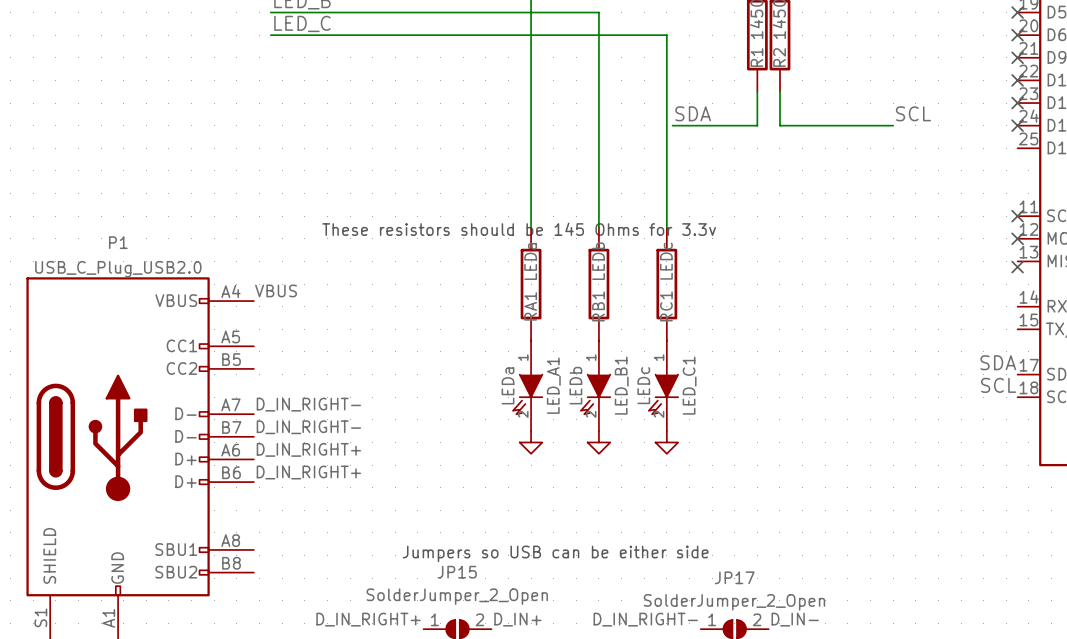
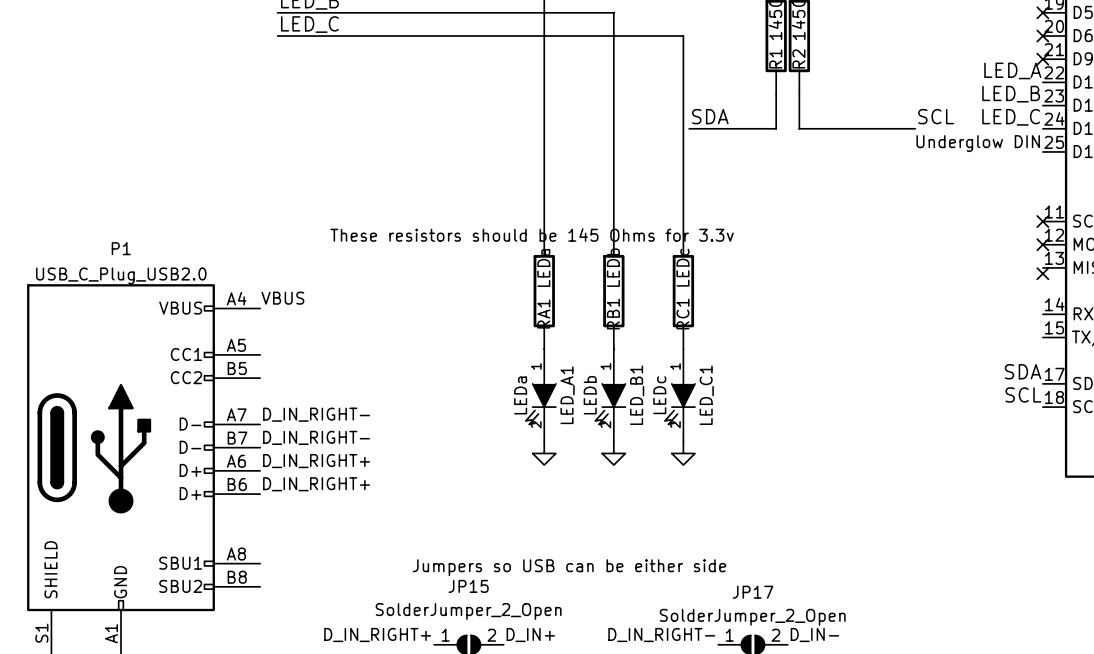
label: none -> LED_A (1012, 70)
no-connect mark: (1017, 80) -> none
label: none -> LED_B (1011, 94)
no-connect mark: (1017, 103) -> none
label: none -> LED_C (1011, 117)
no-connect mark: (1017, 125) -> none
label: none -> Underglow DIN (978, 143)

